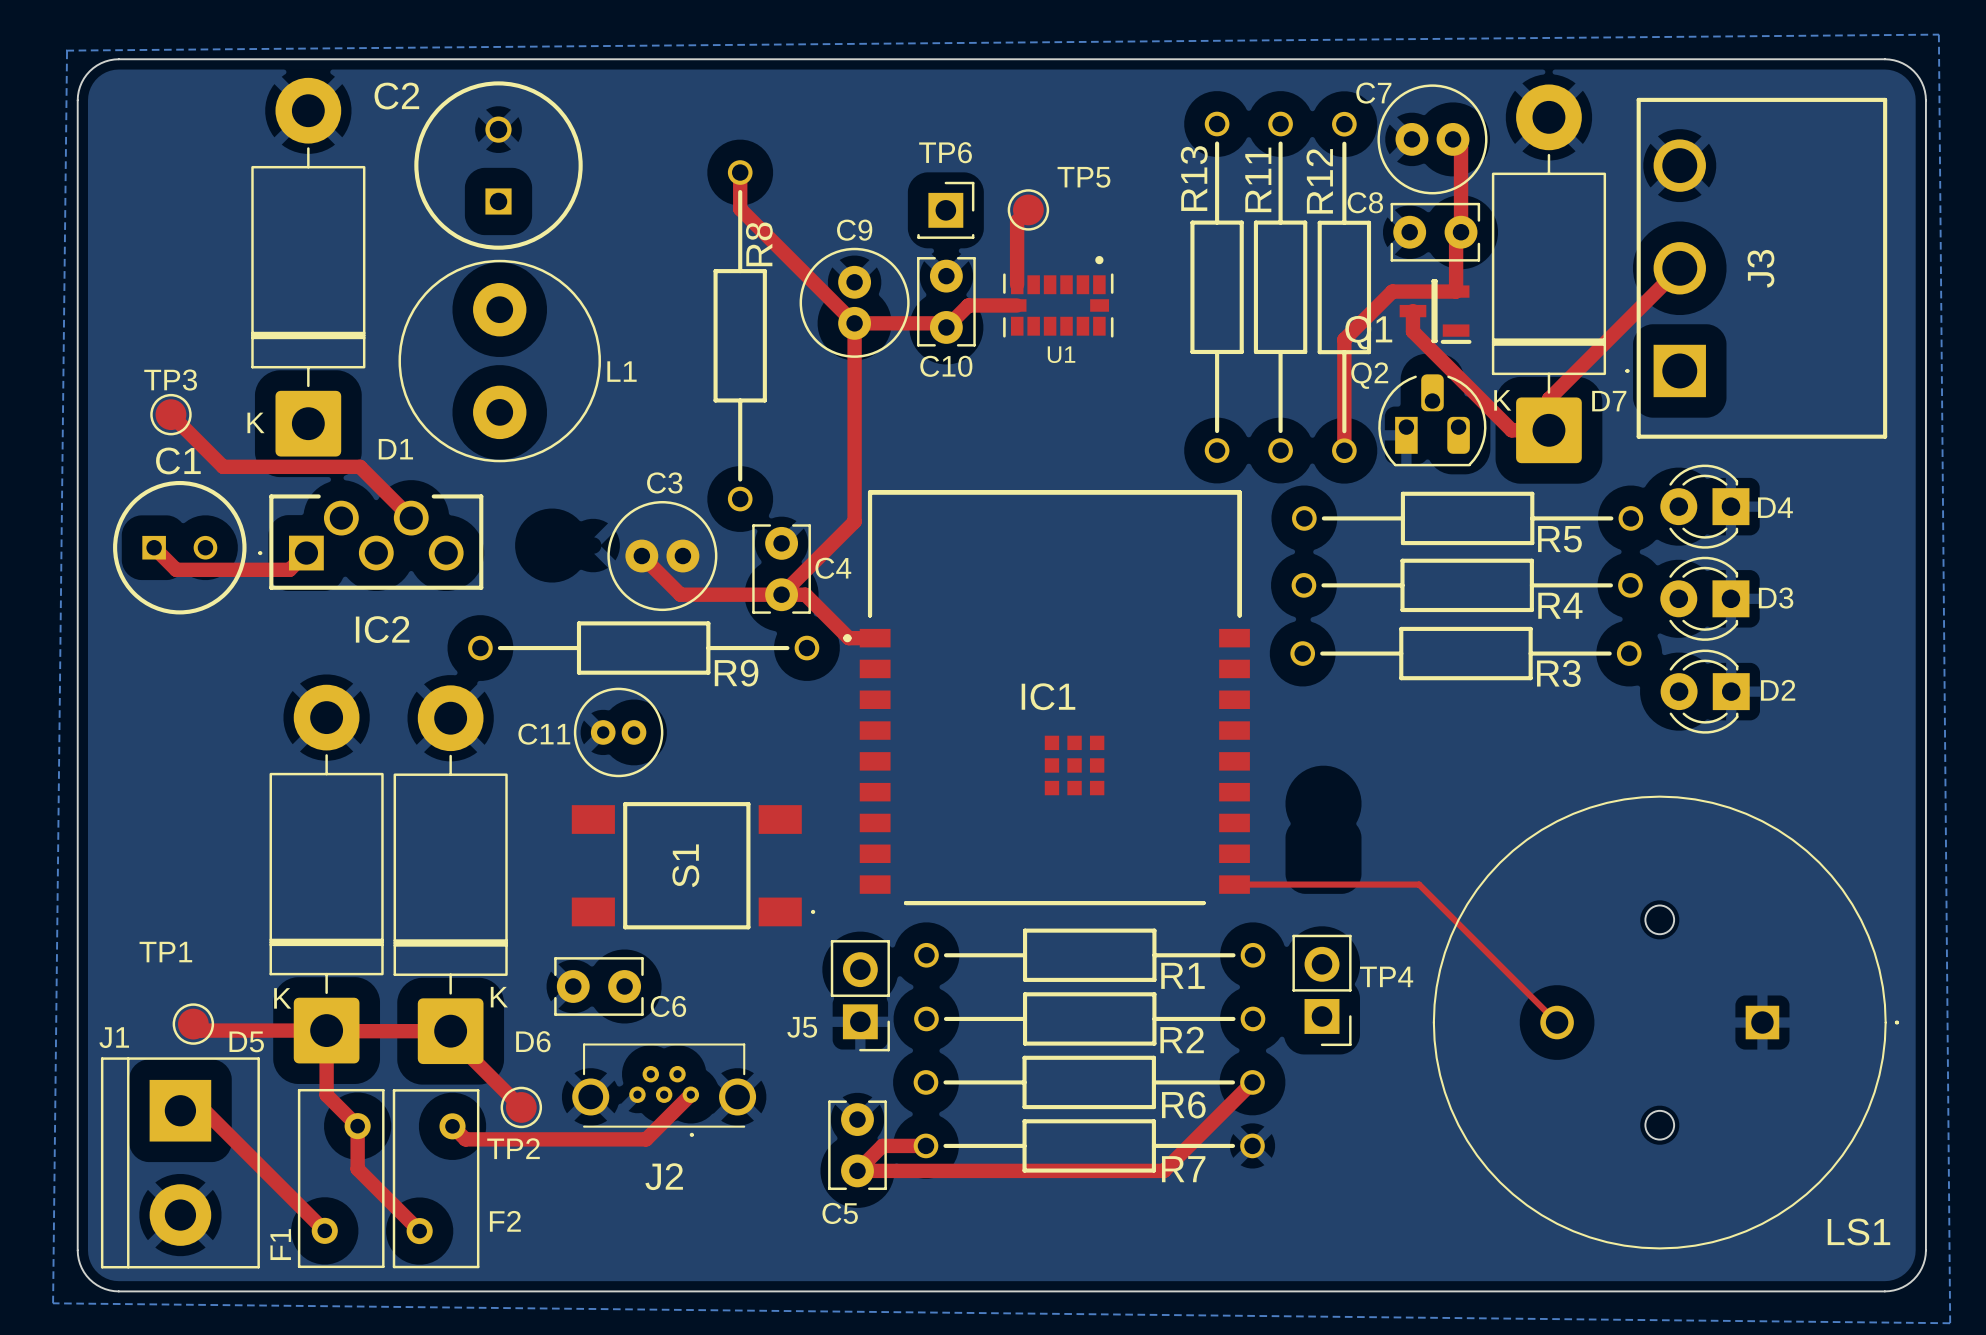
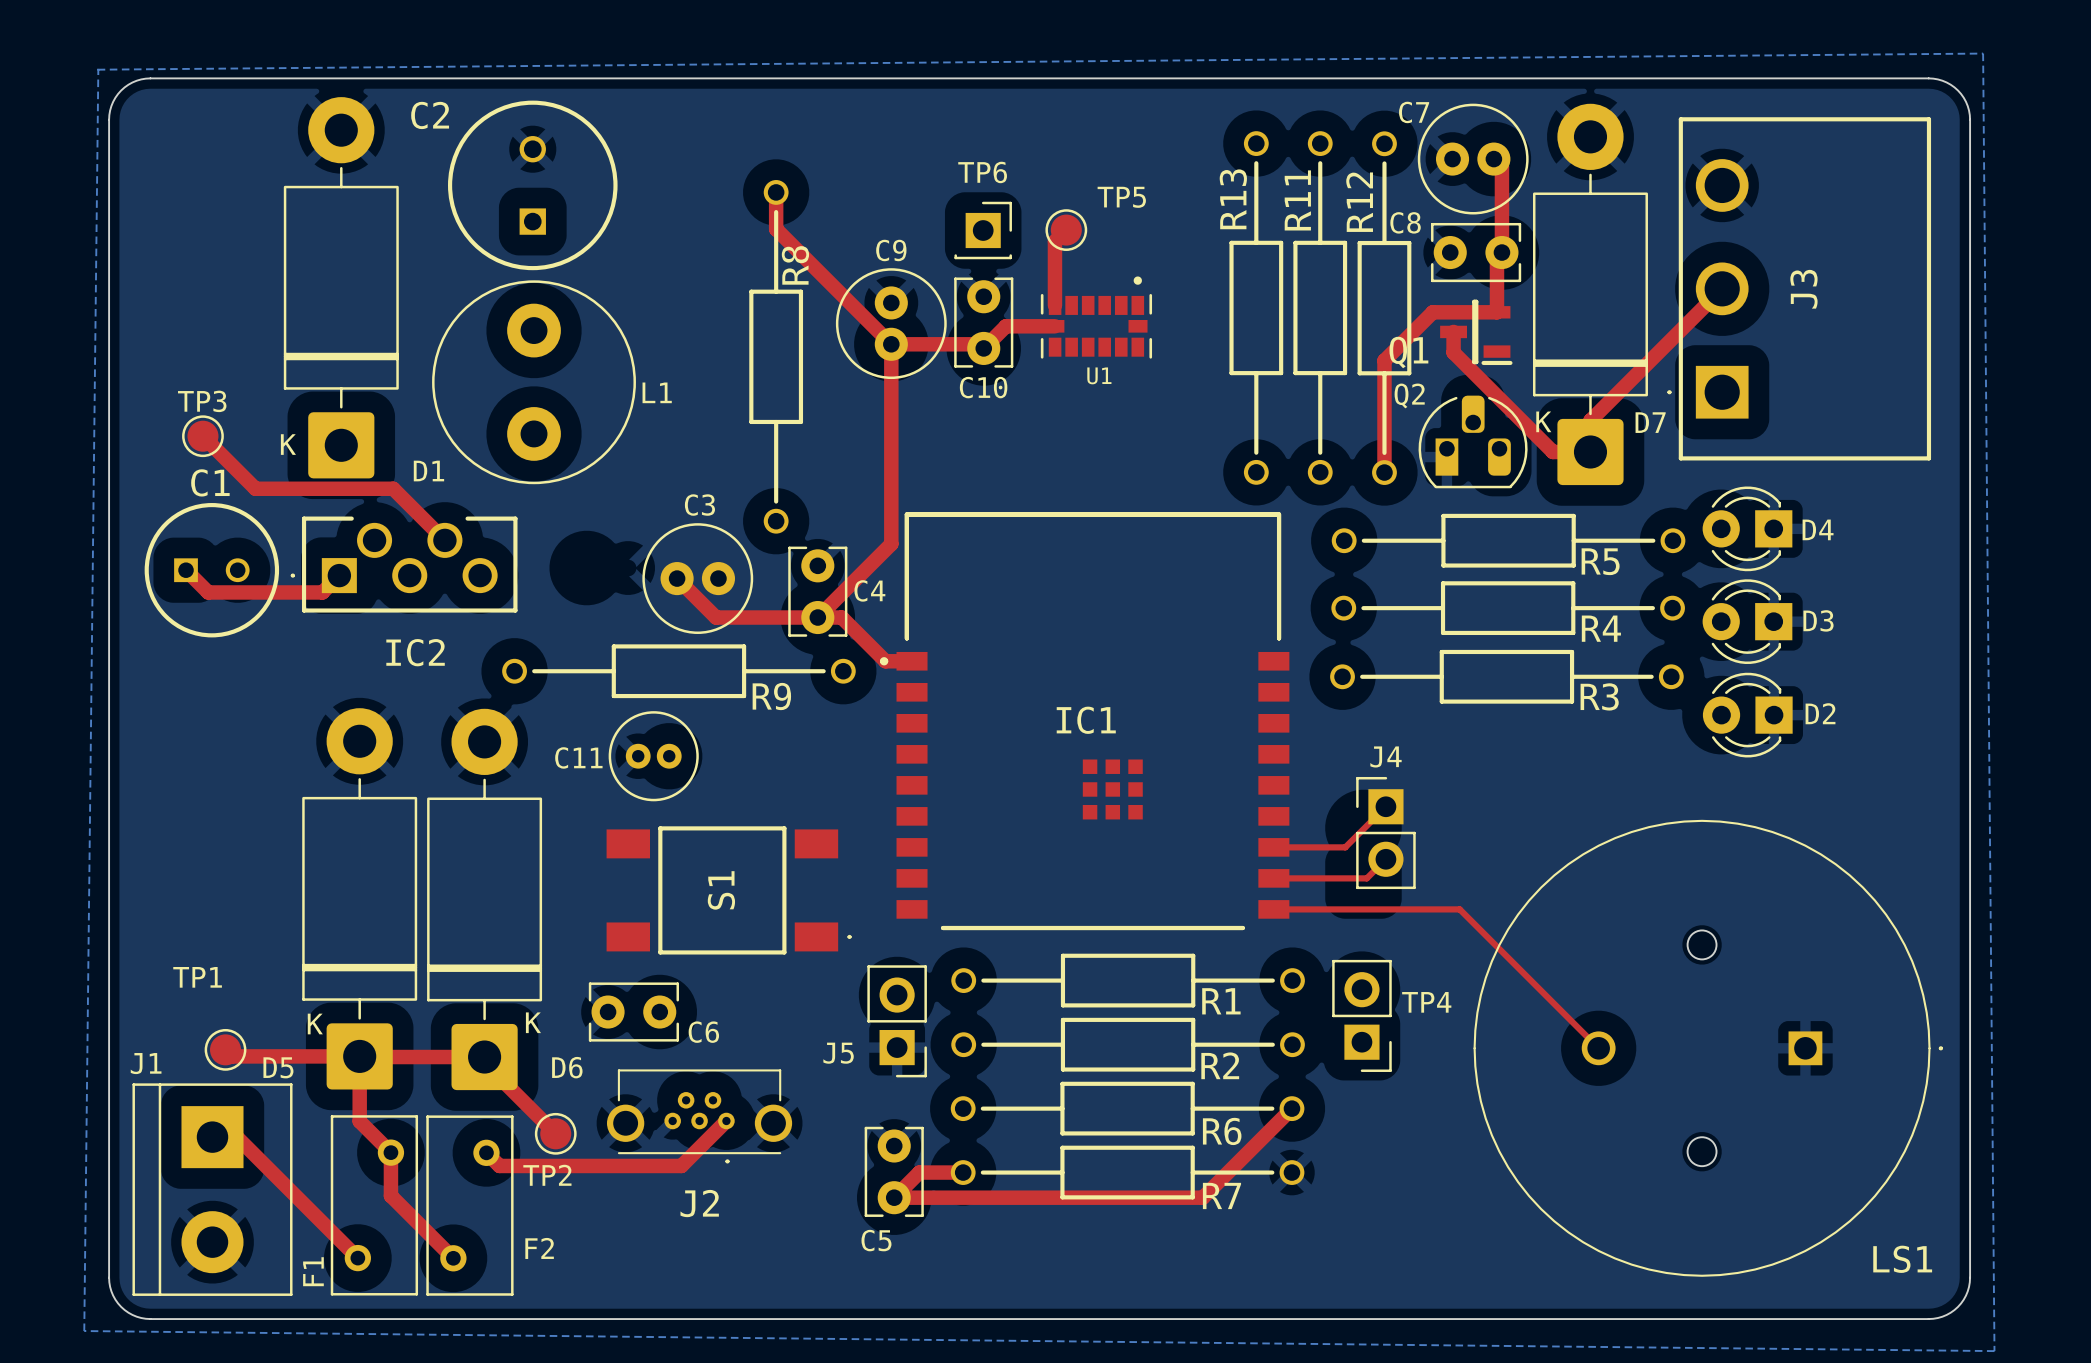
top track: none -> (1385, 806) (1345, 847) (1273, 847)
J4: none -> (1385, 833)
top track: none -> (1385, 859) (1366, 878) (1273, 878)

